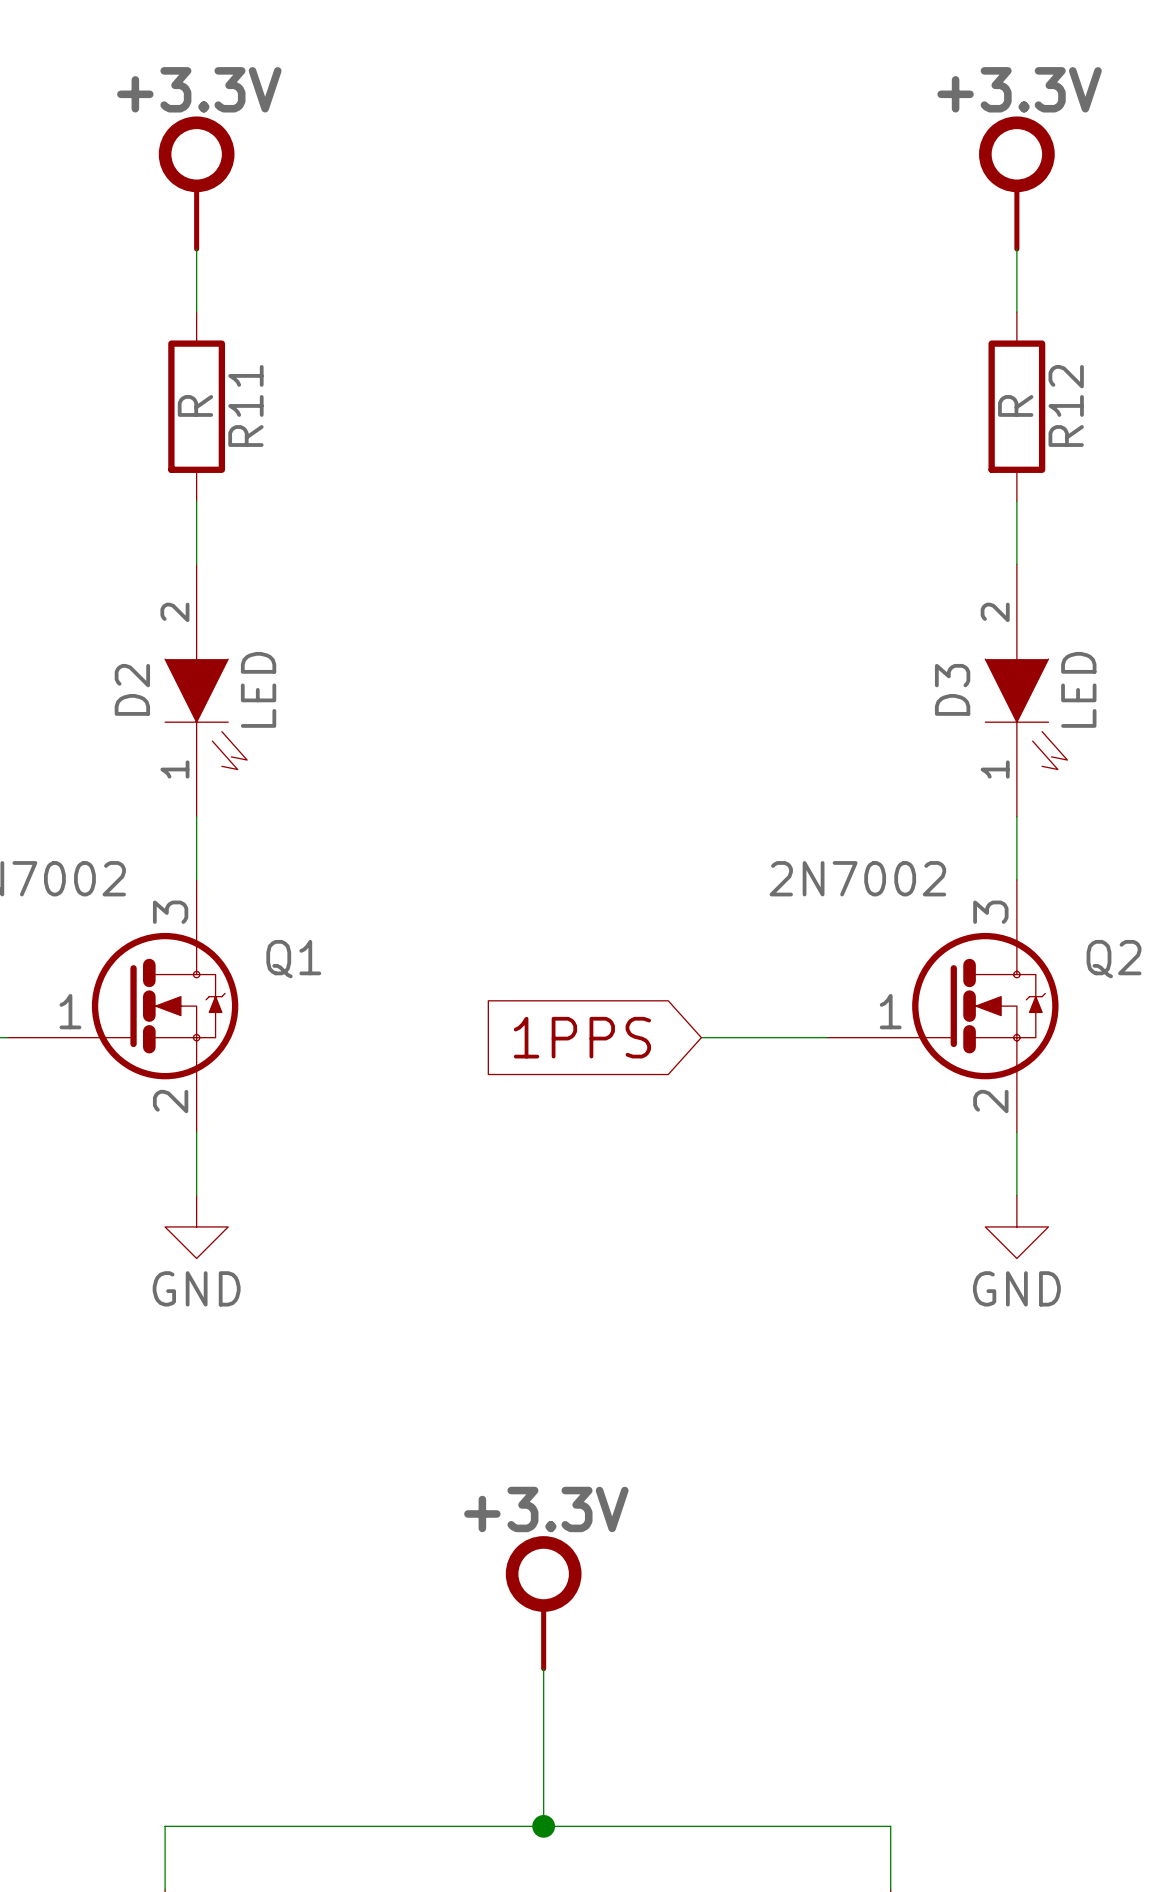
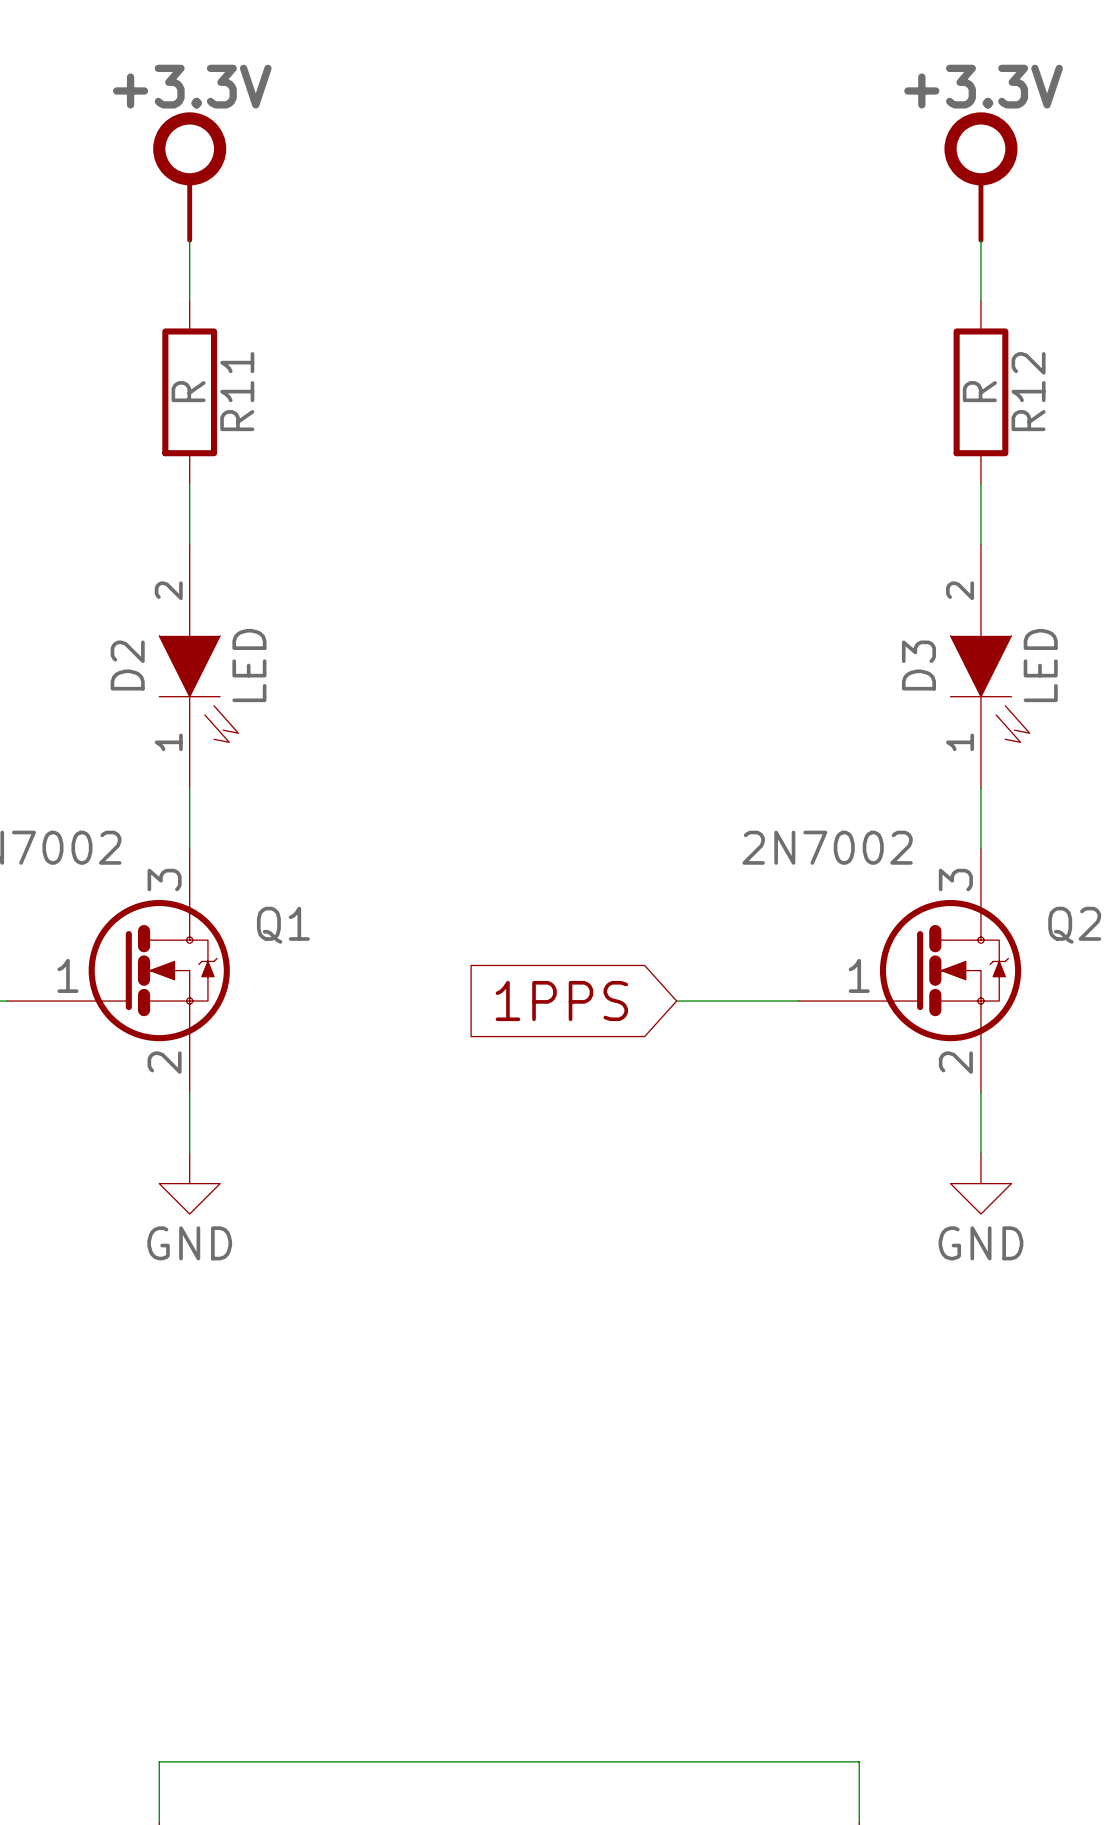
power symbol: (543, 1603) -> none
wire: (543, 1668) (543, 1826) -> none
junction: (543, 1826) -> none

